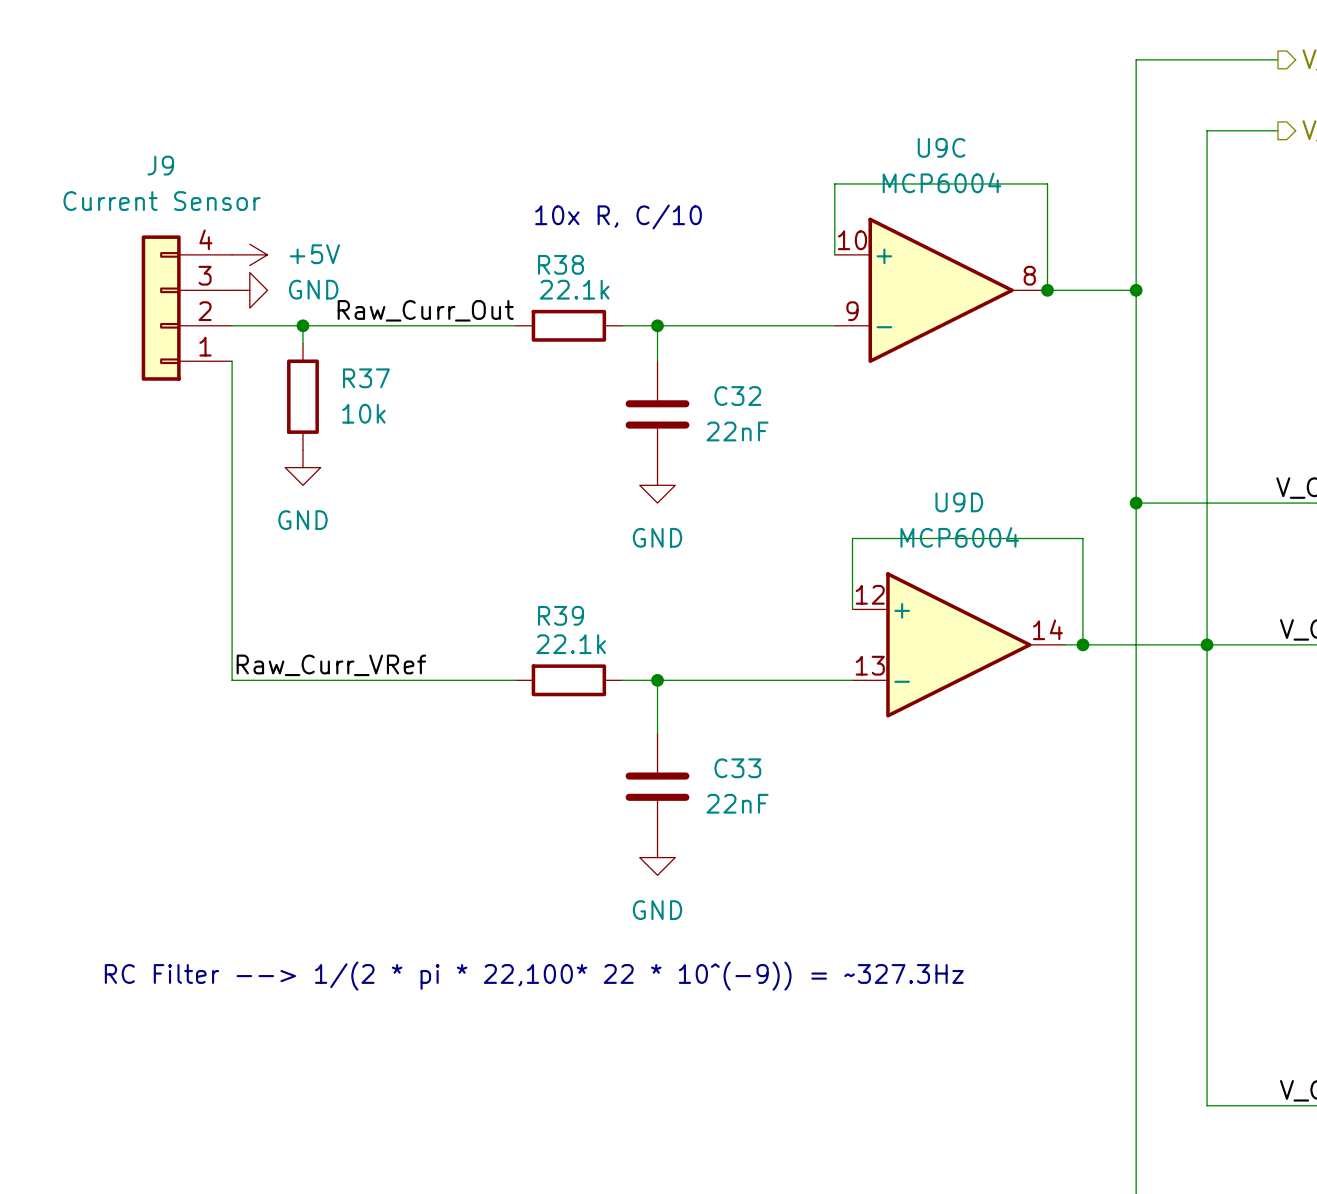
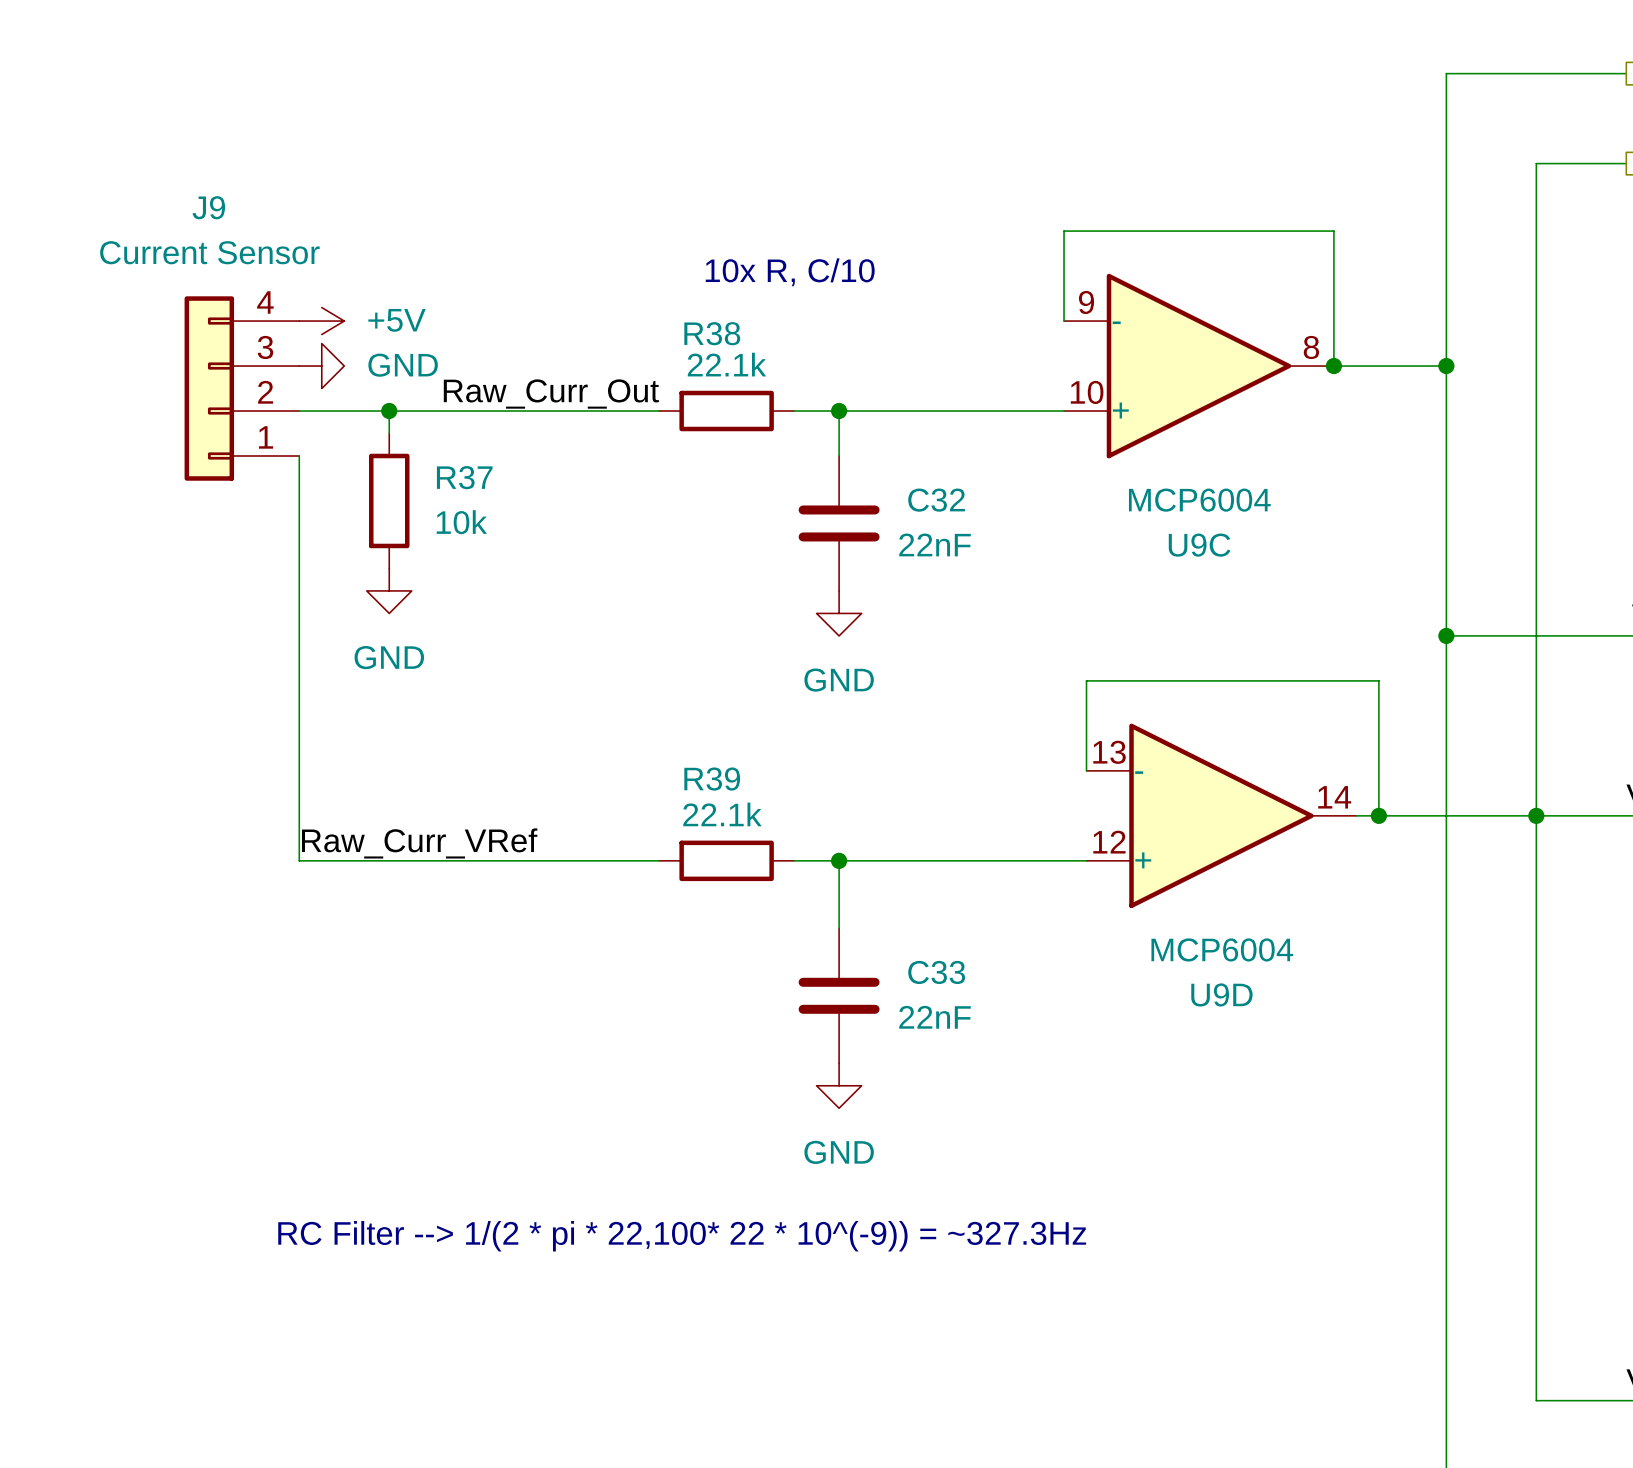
U9C flip: as is (941, 290) -> up-down (1198, 366)
U9D flip: as is (958, 644) -> up-down (1221, 815)

